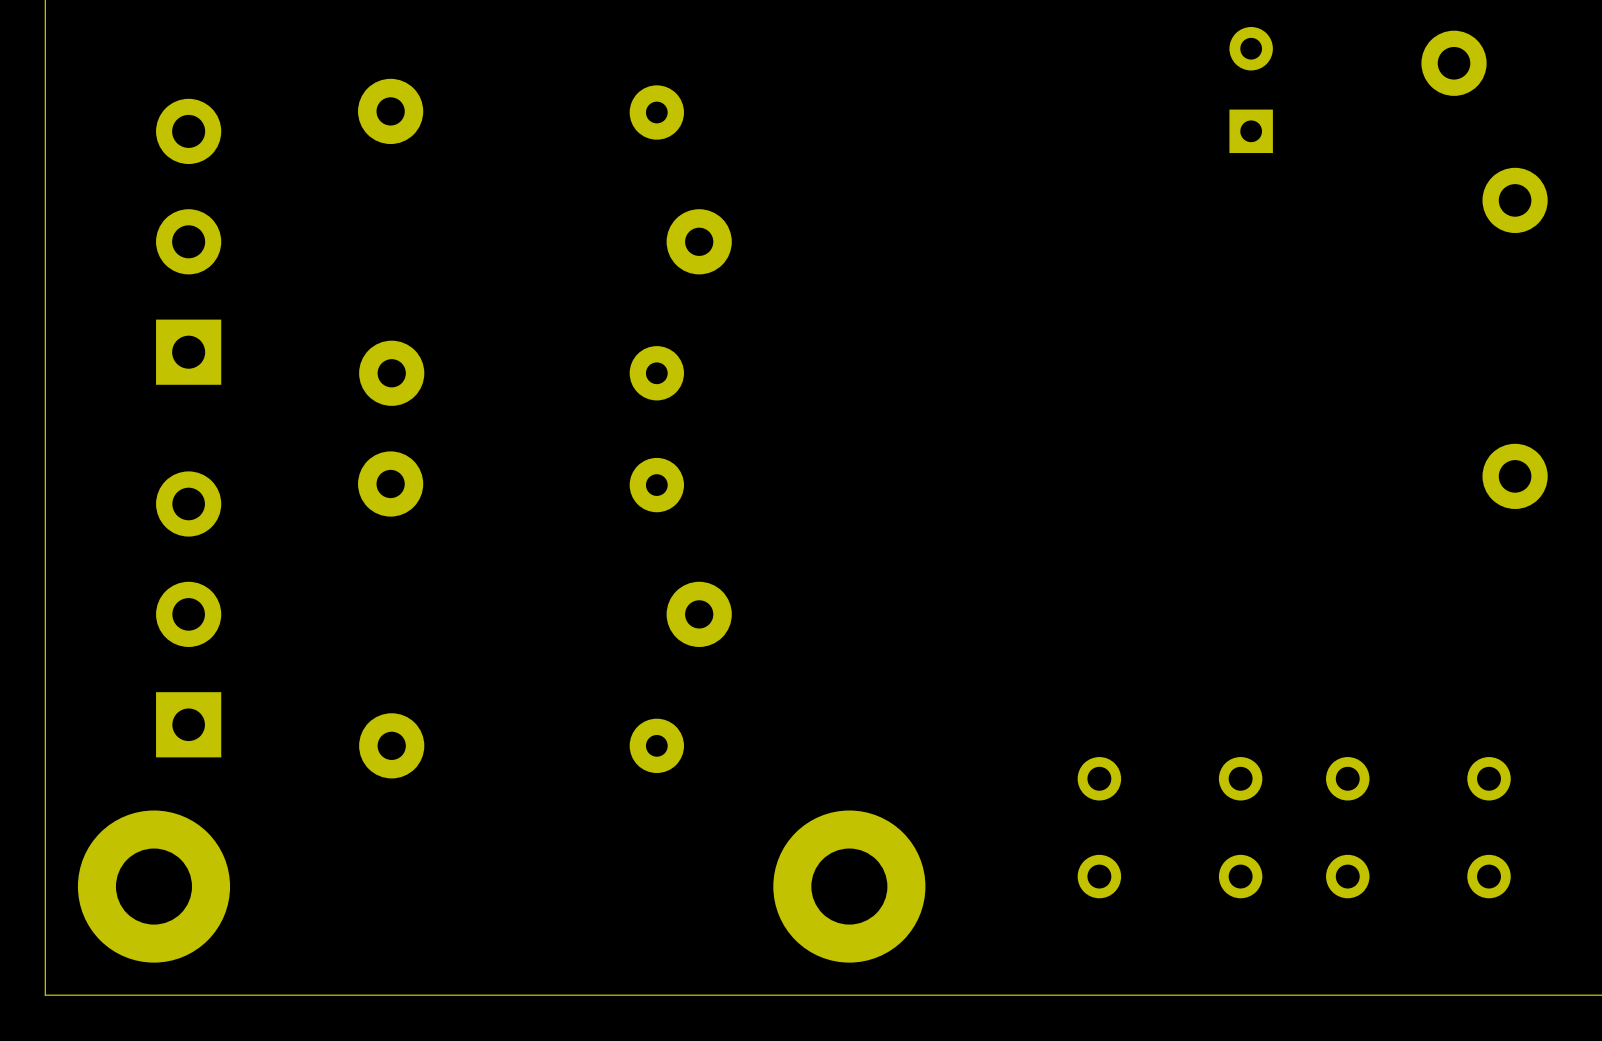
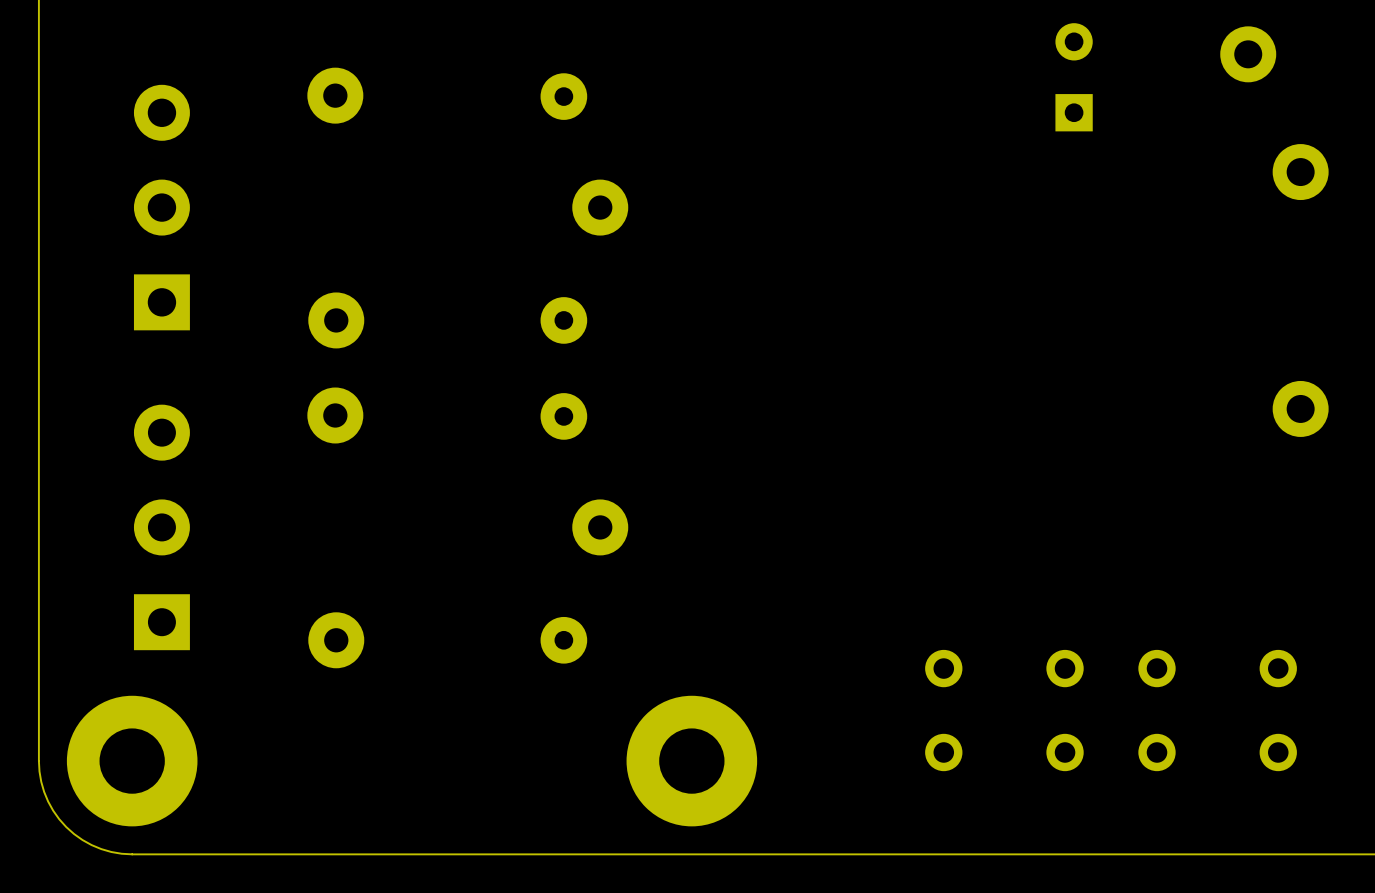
board edge: (45, 886) (45, 995) (153, 995) -> (38, 761) (44, 791) (53, 810) (66, 827) (82, 840) (101, 849) (132, 854)
part position: (849, 886) -> (691, 761)

